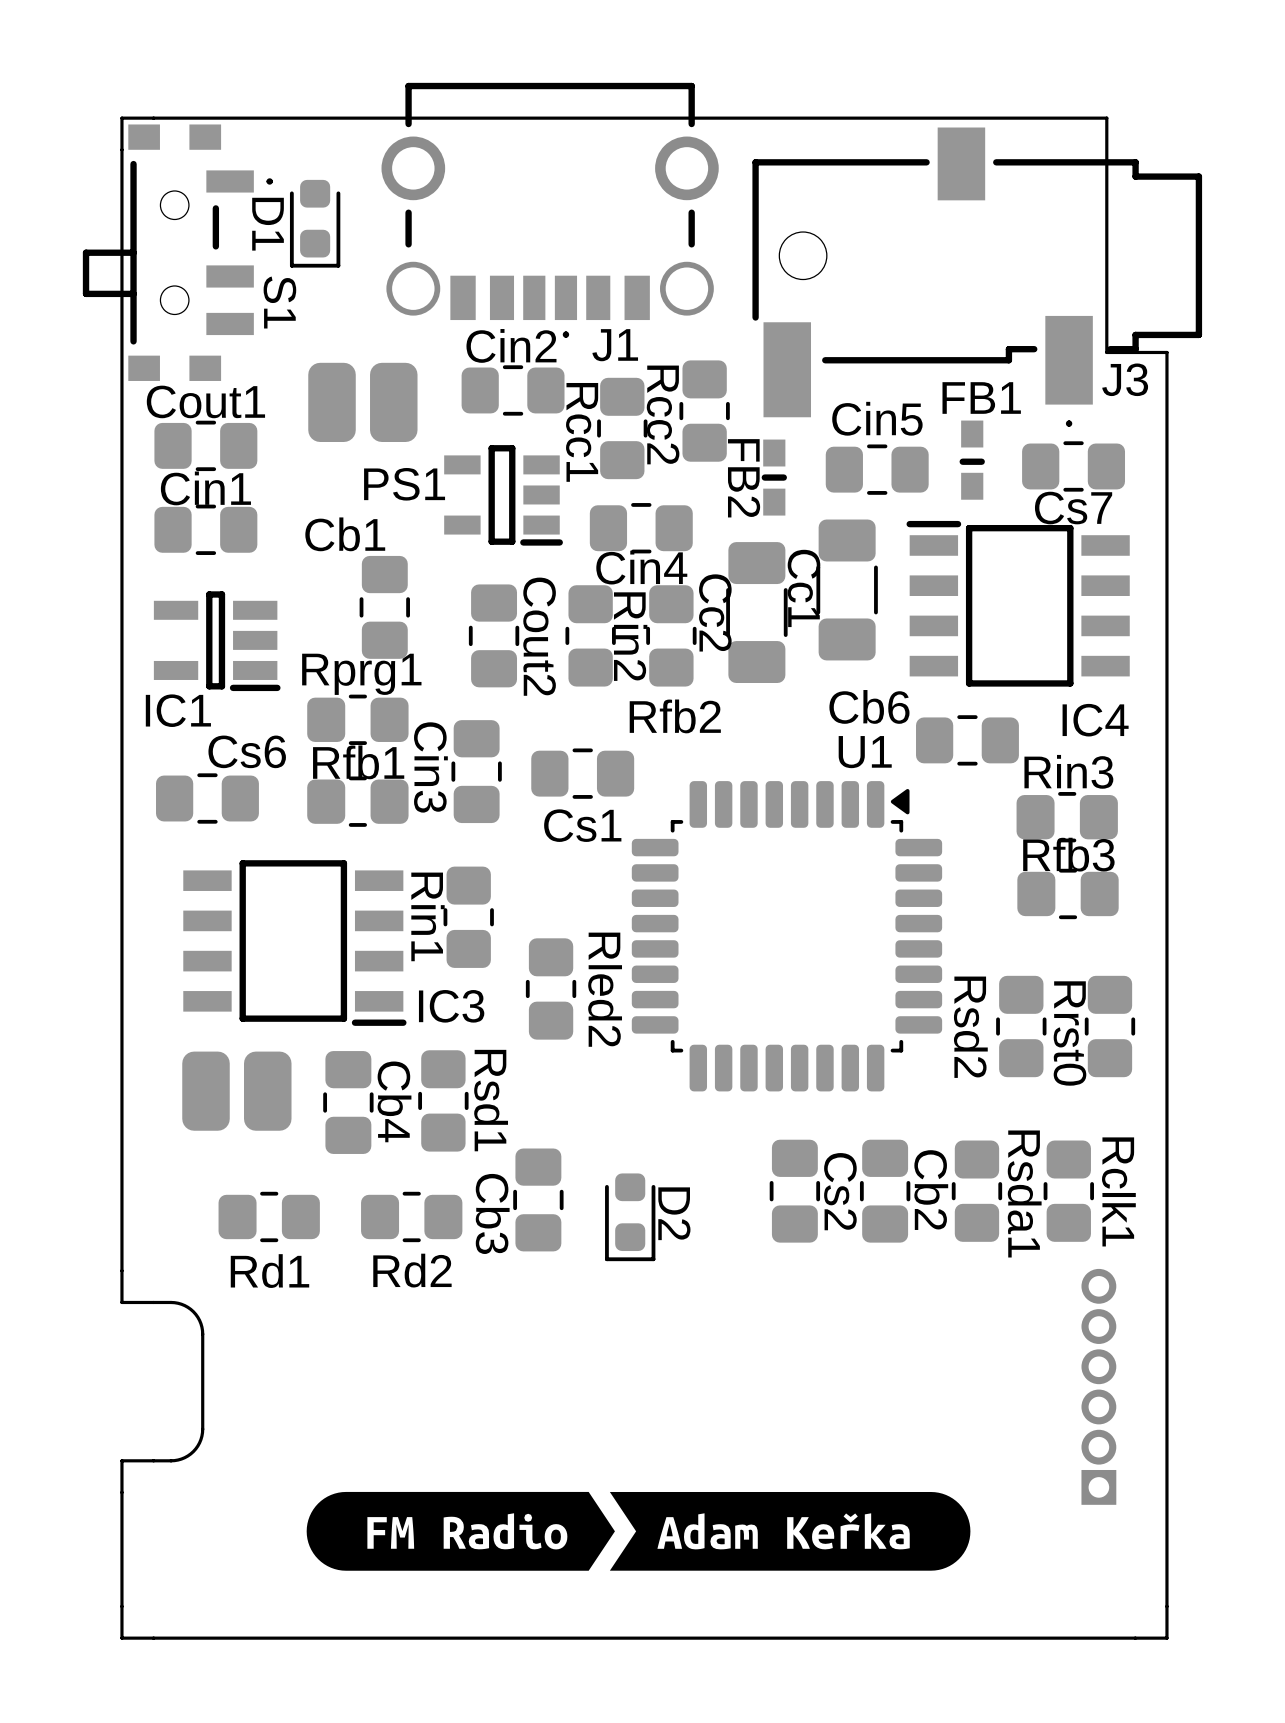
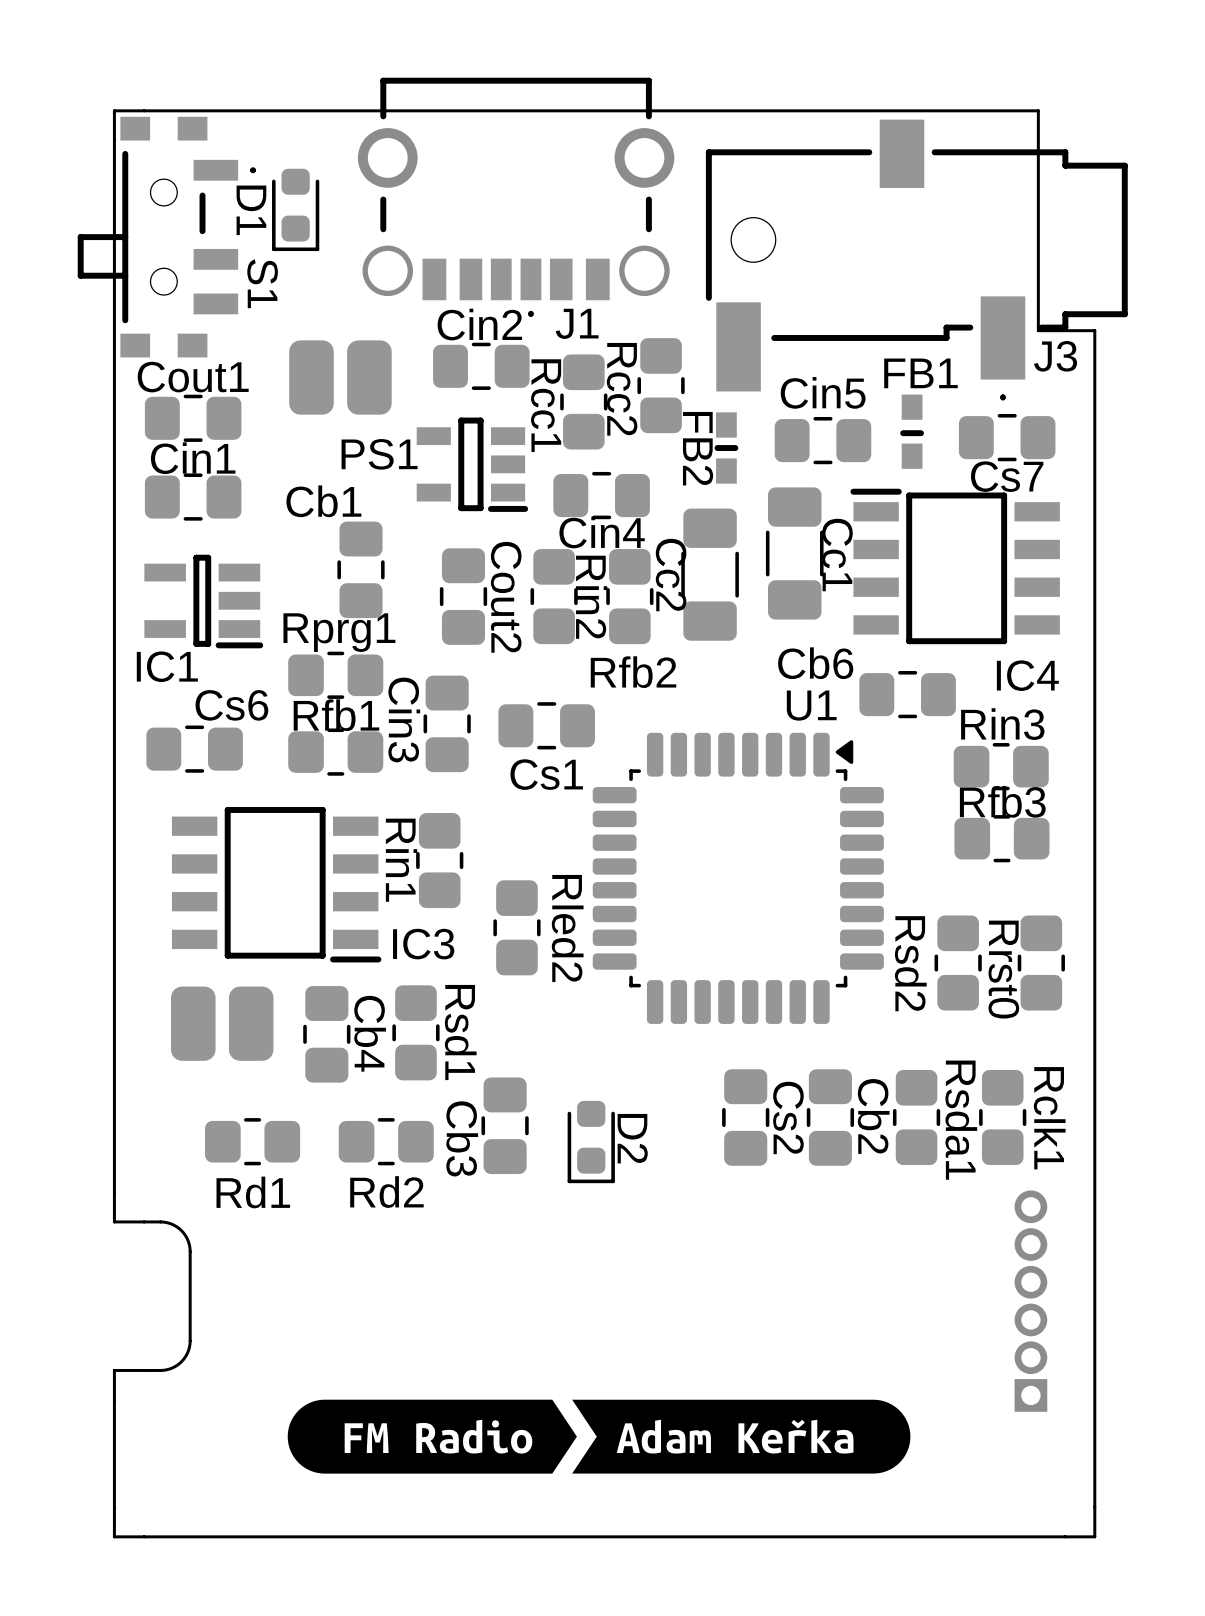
Cc1 name position: Cc1 (803, 588) -> Cc1 (837, 555)

